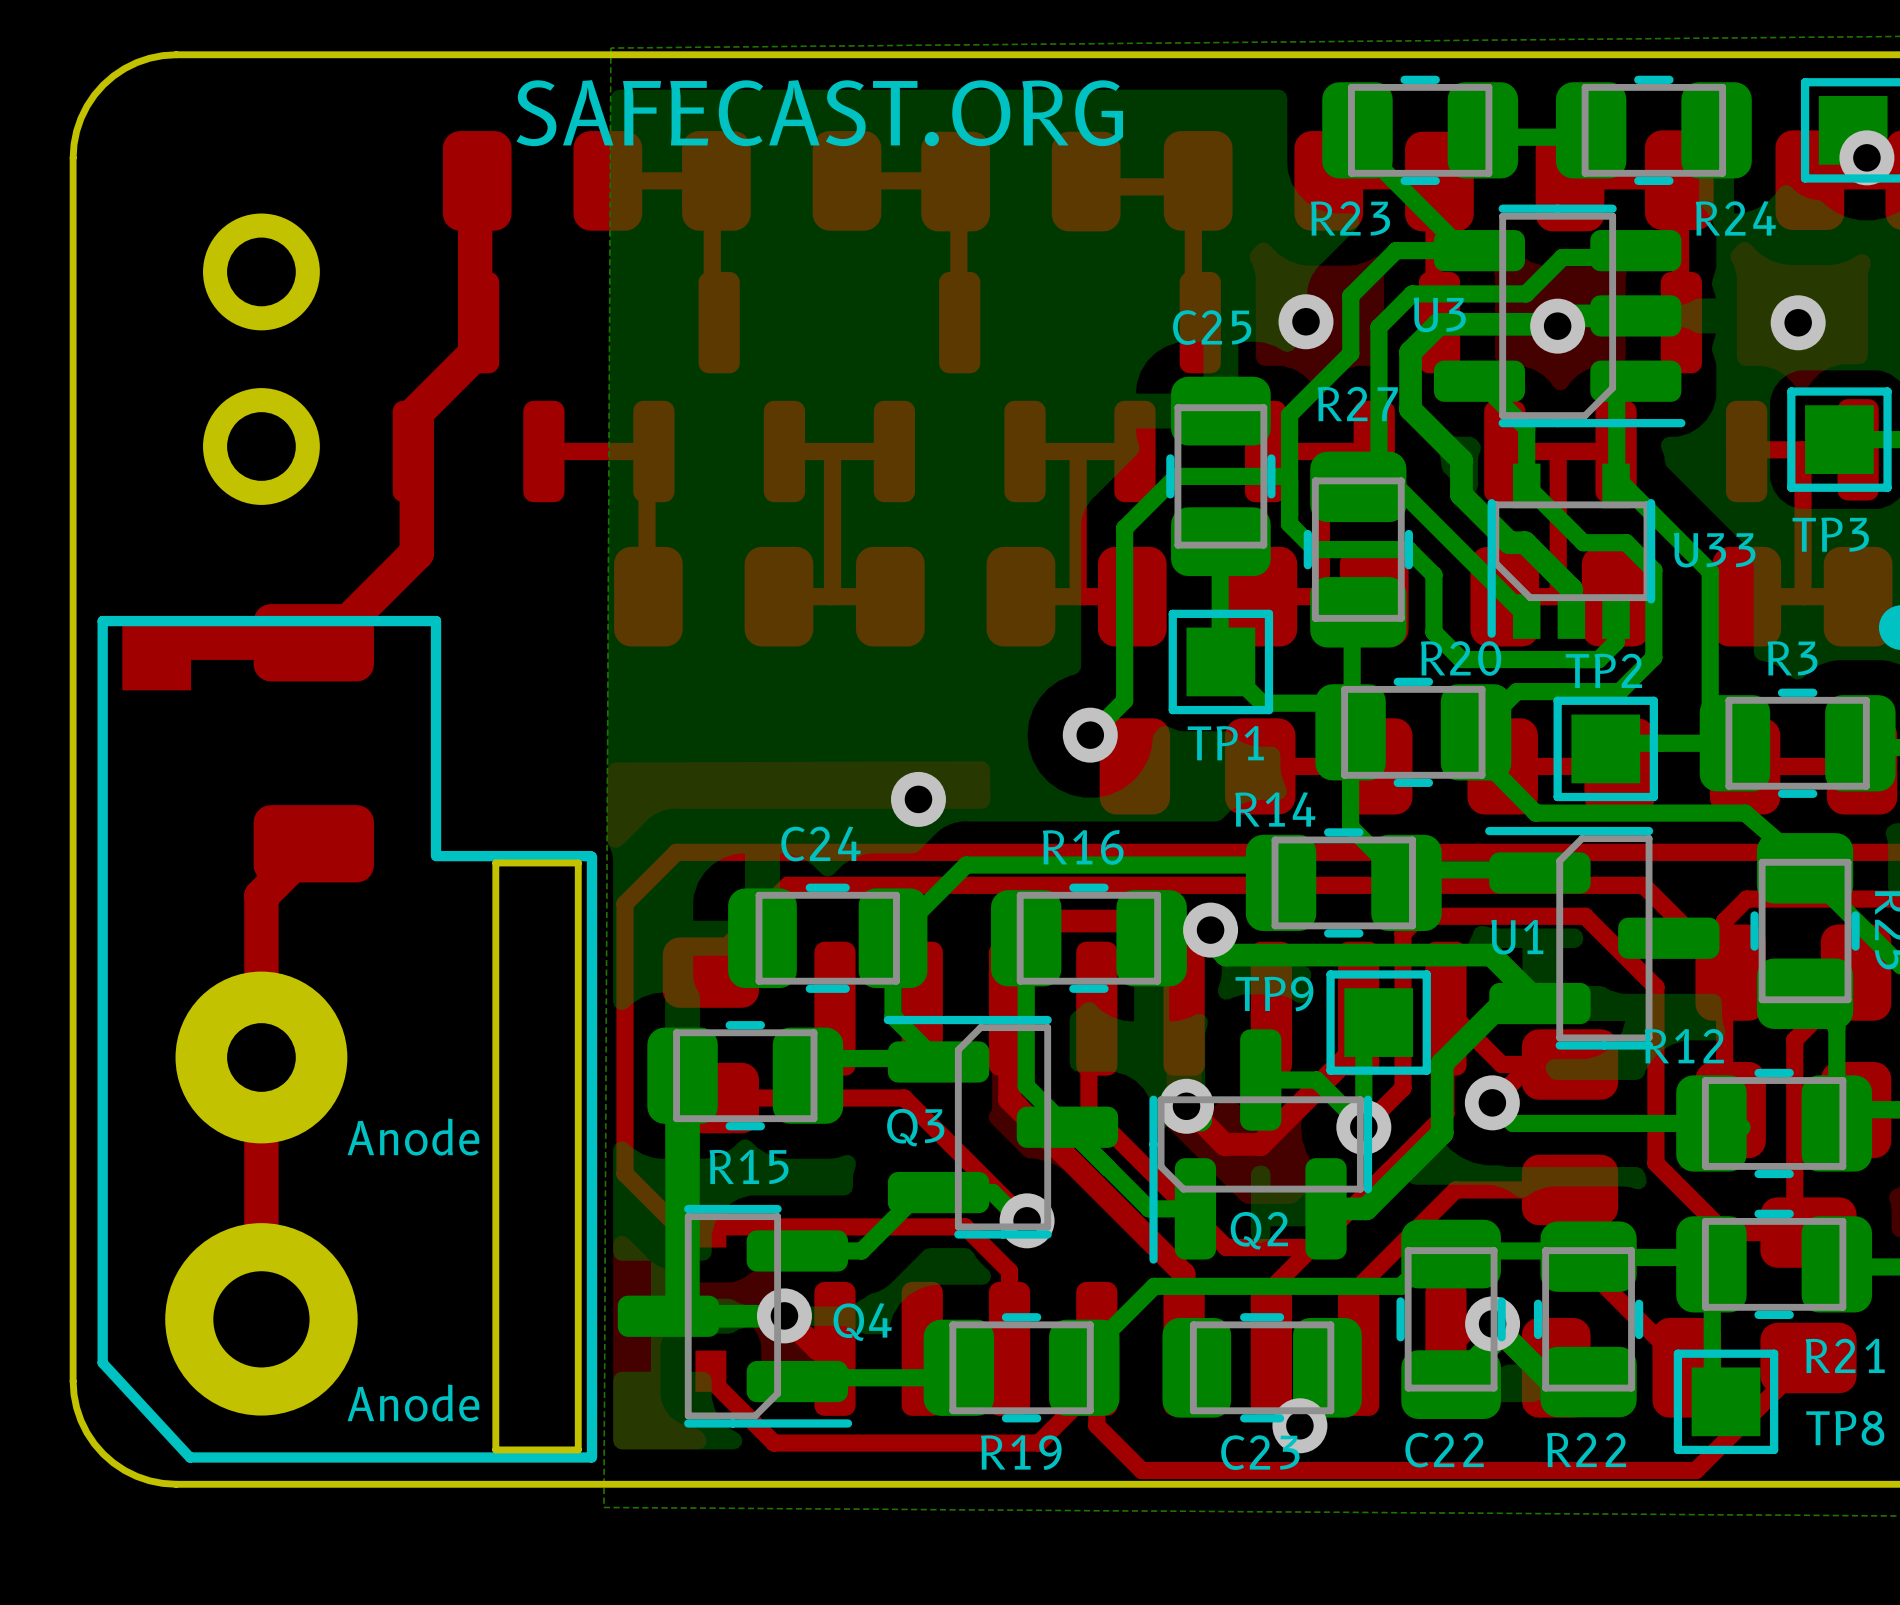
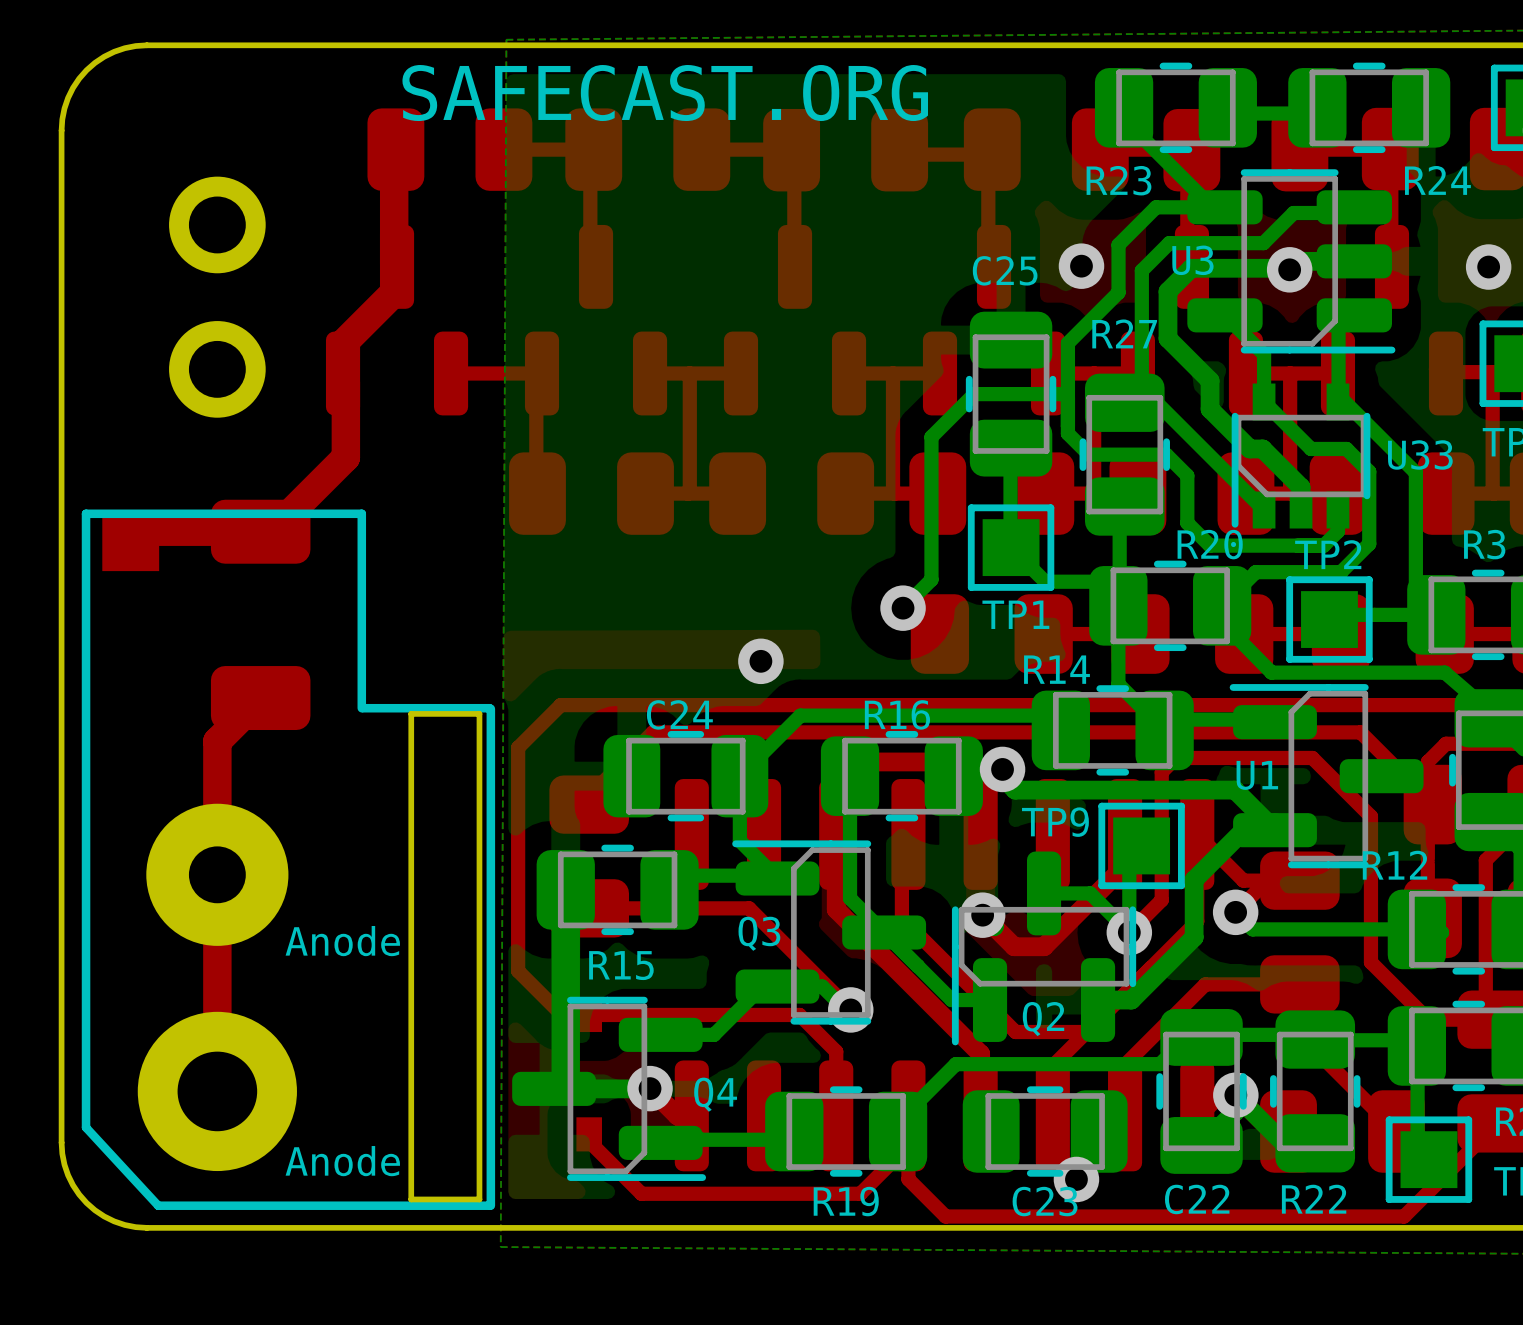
text position: SAFECAST.ORG (819, 113) -> SAFECAST.ORG (665, 93)
C24 name position: C24 (821, 844) -> C24 (679, 714)
R16 name position: R16 (1083, 847) -> R16 (897, 714)

